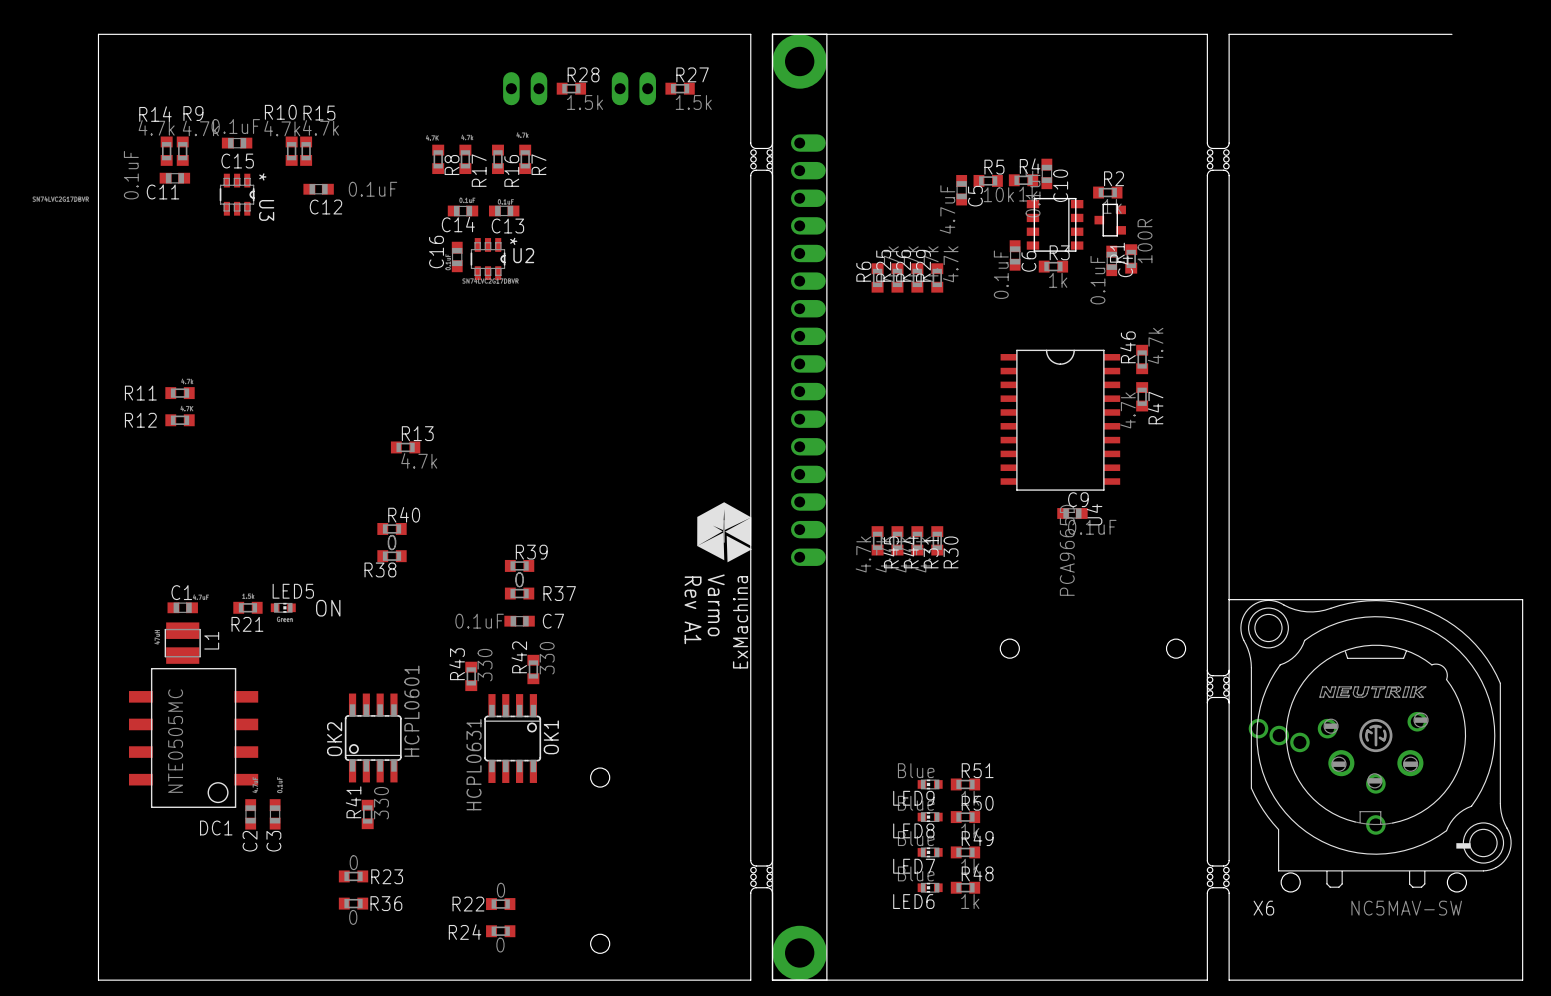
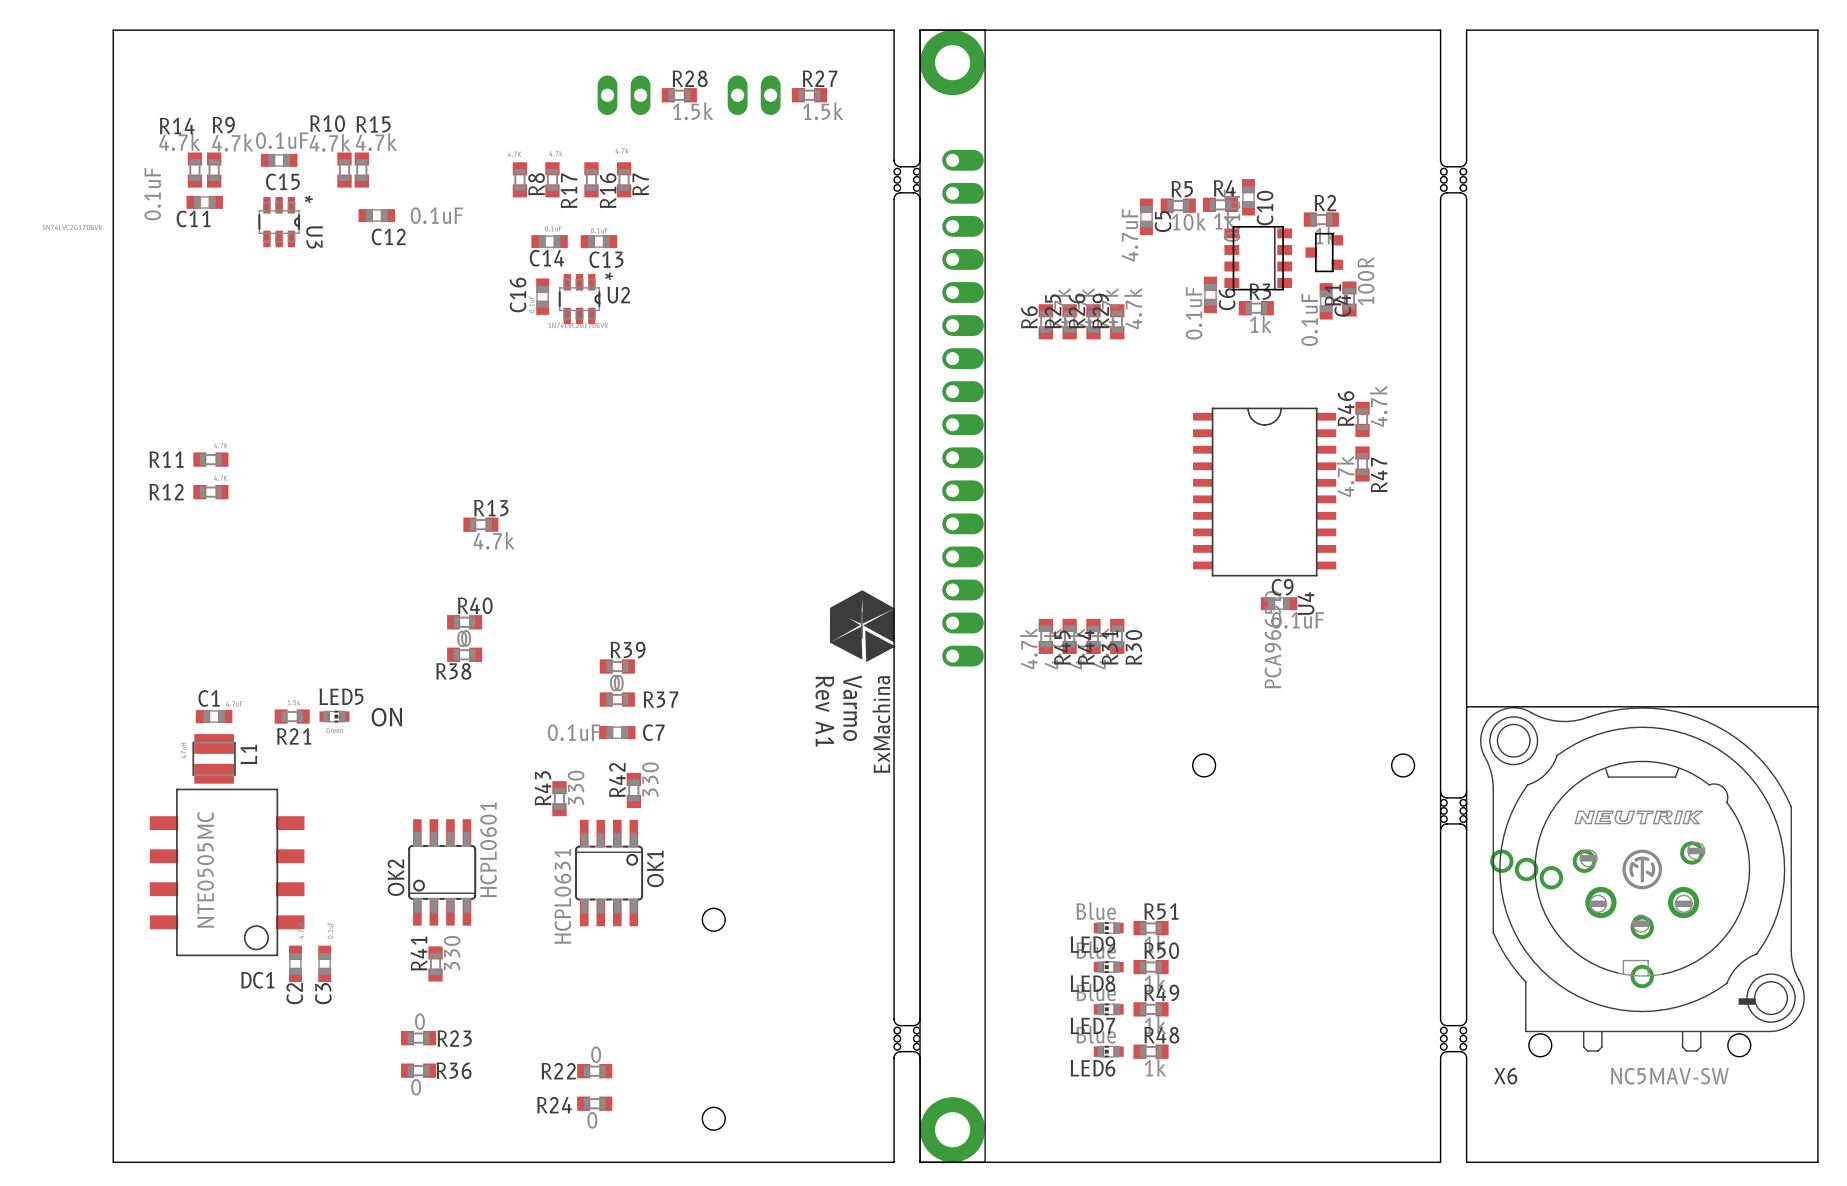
board edge: none -> (1733, 30) (1817, 30) (1817, 706)

